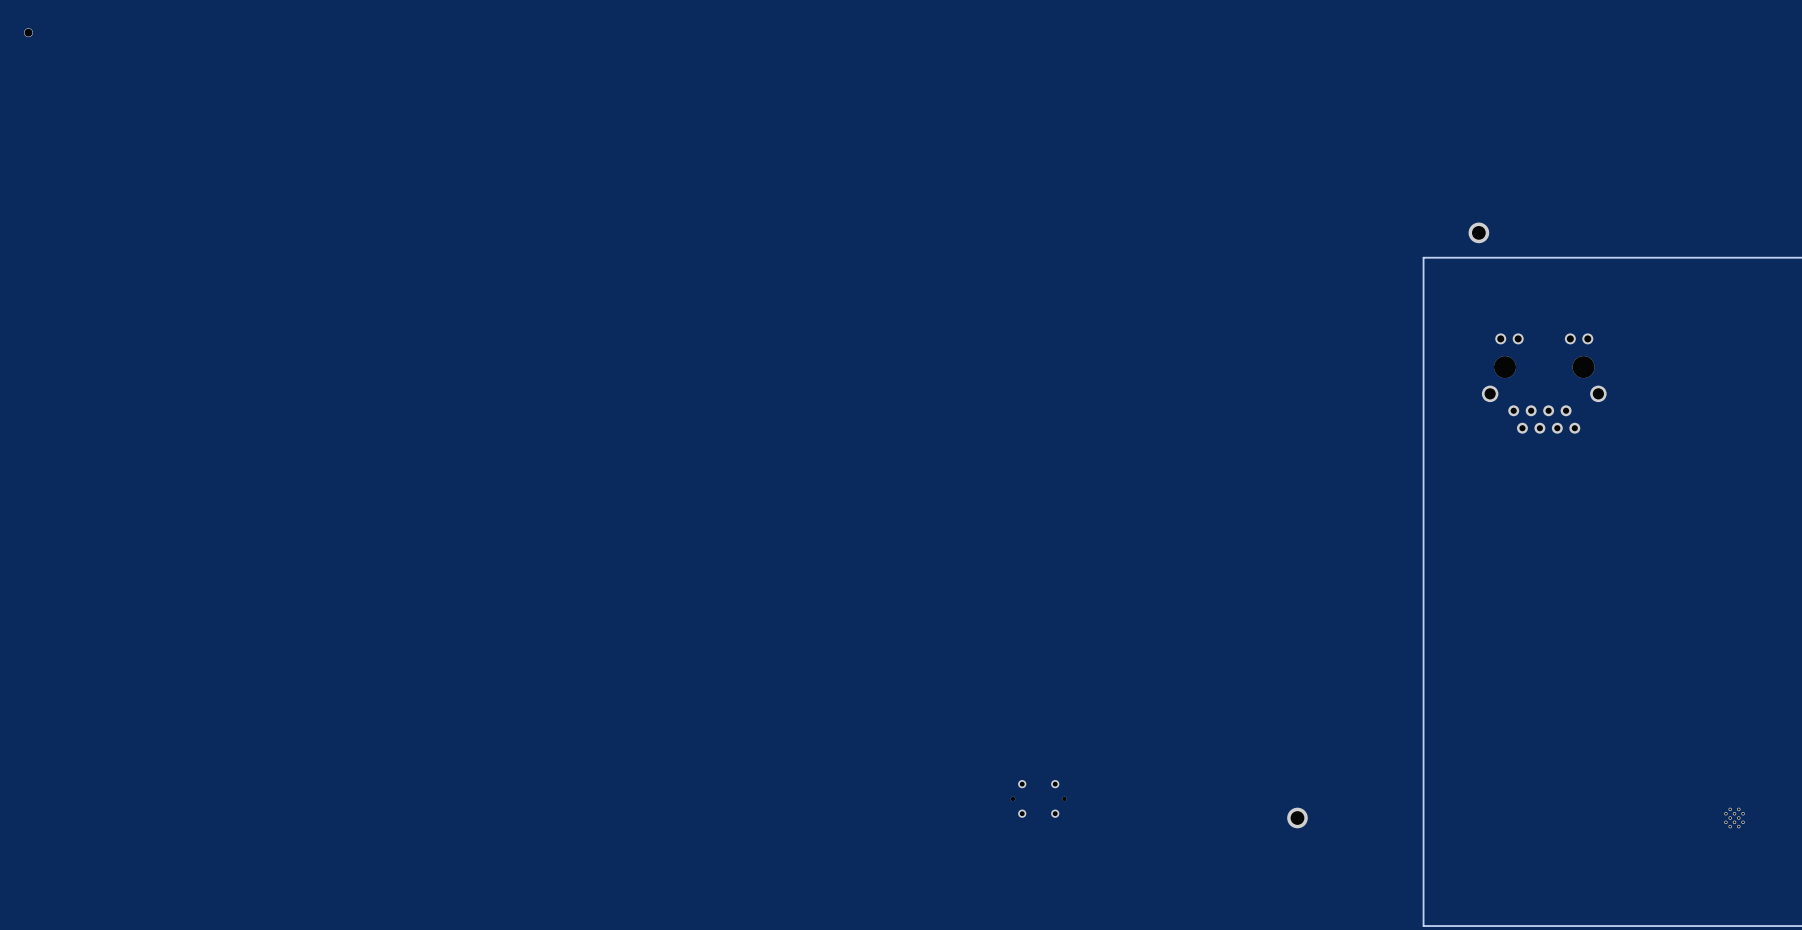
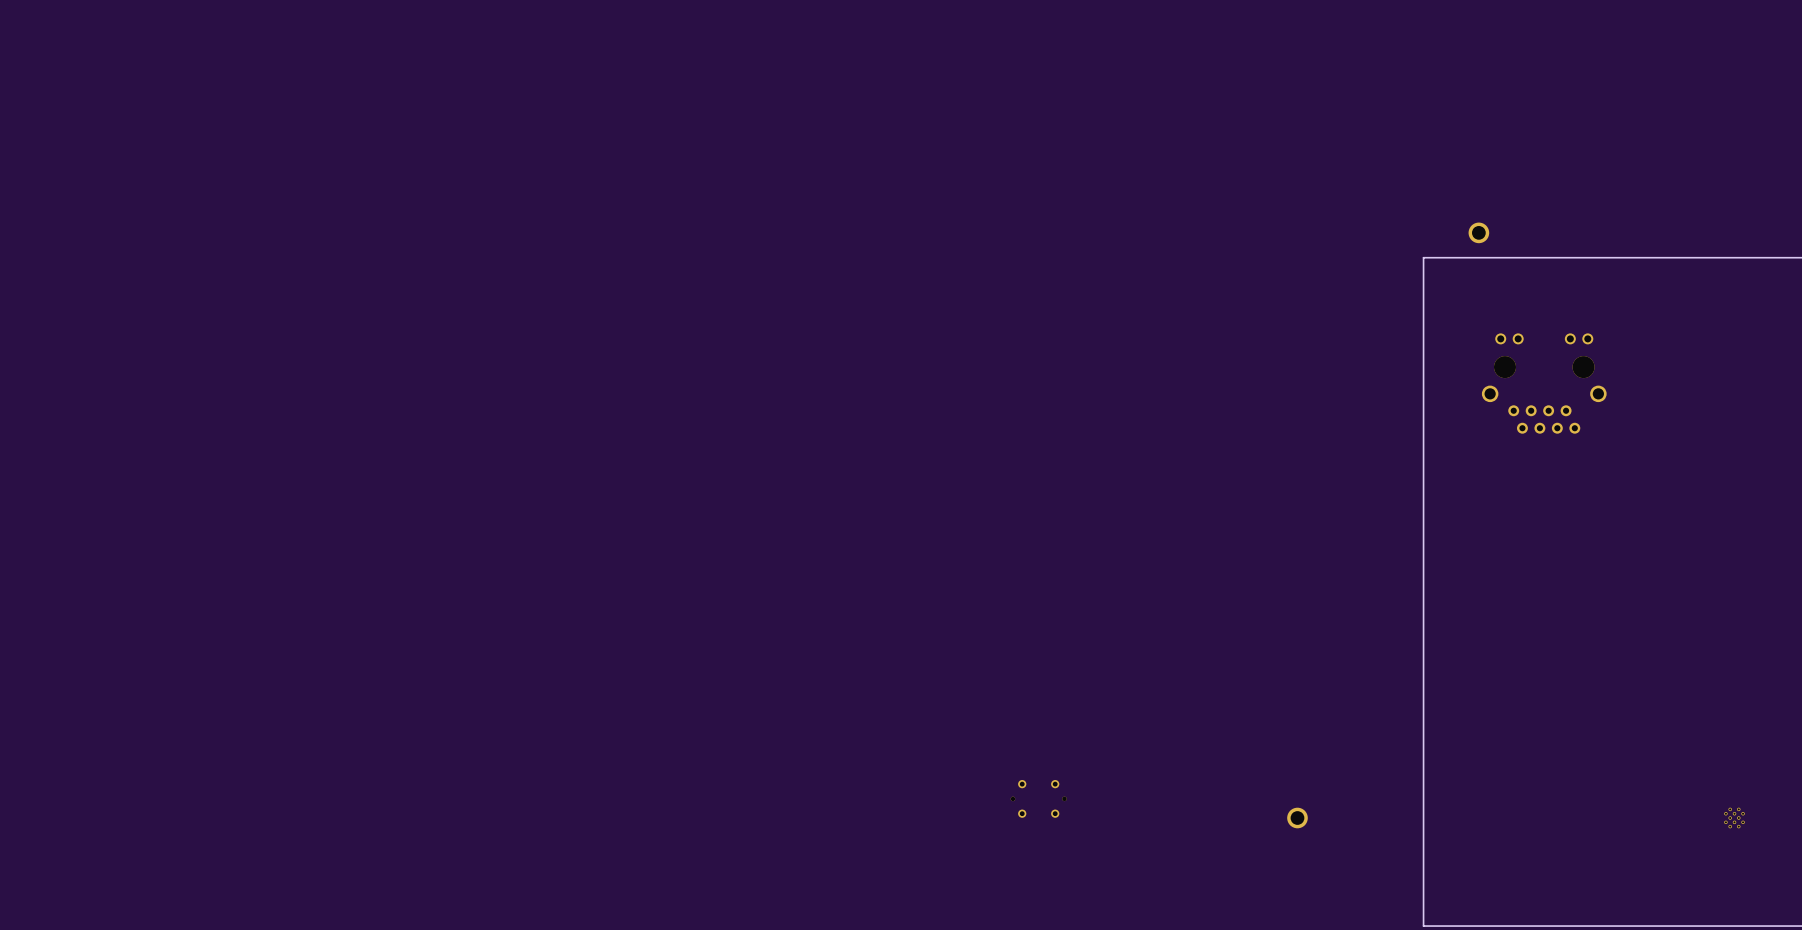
part: (28, 32) -> none

